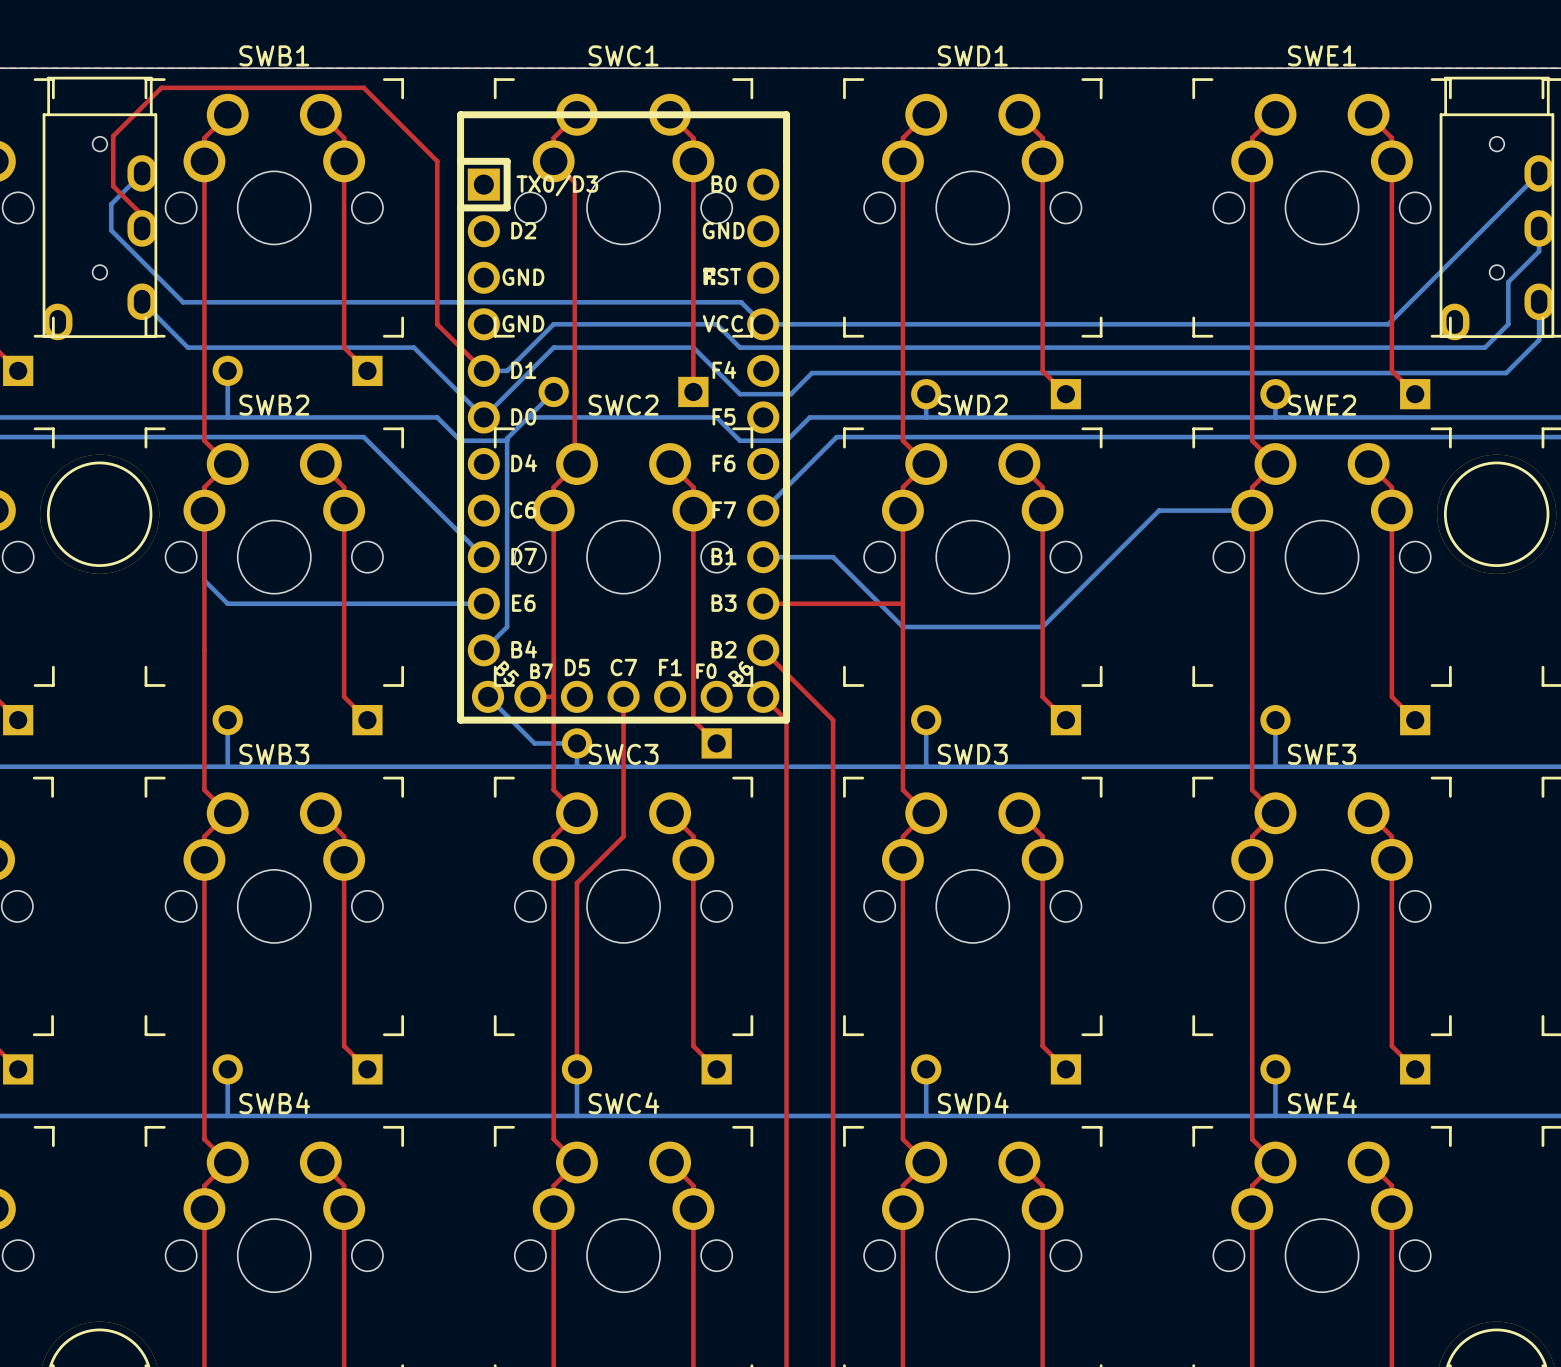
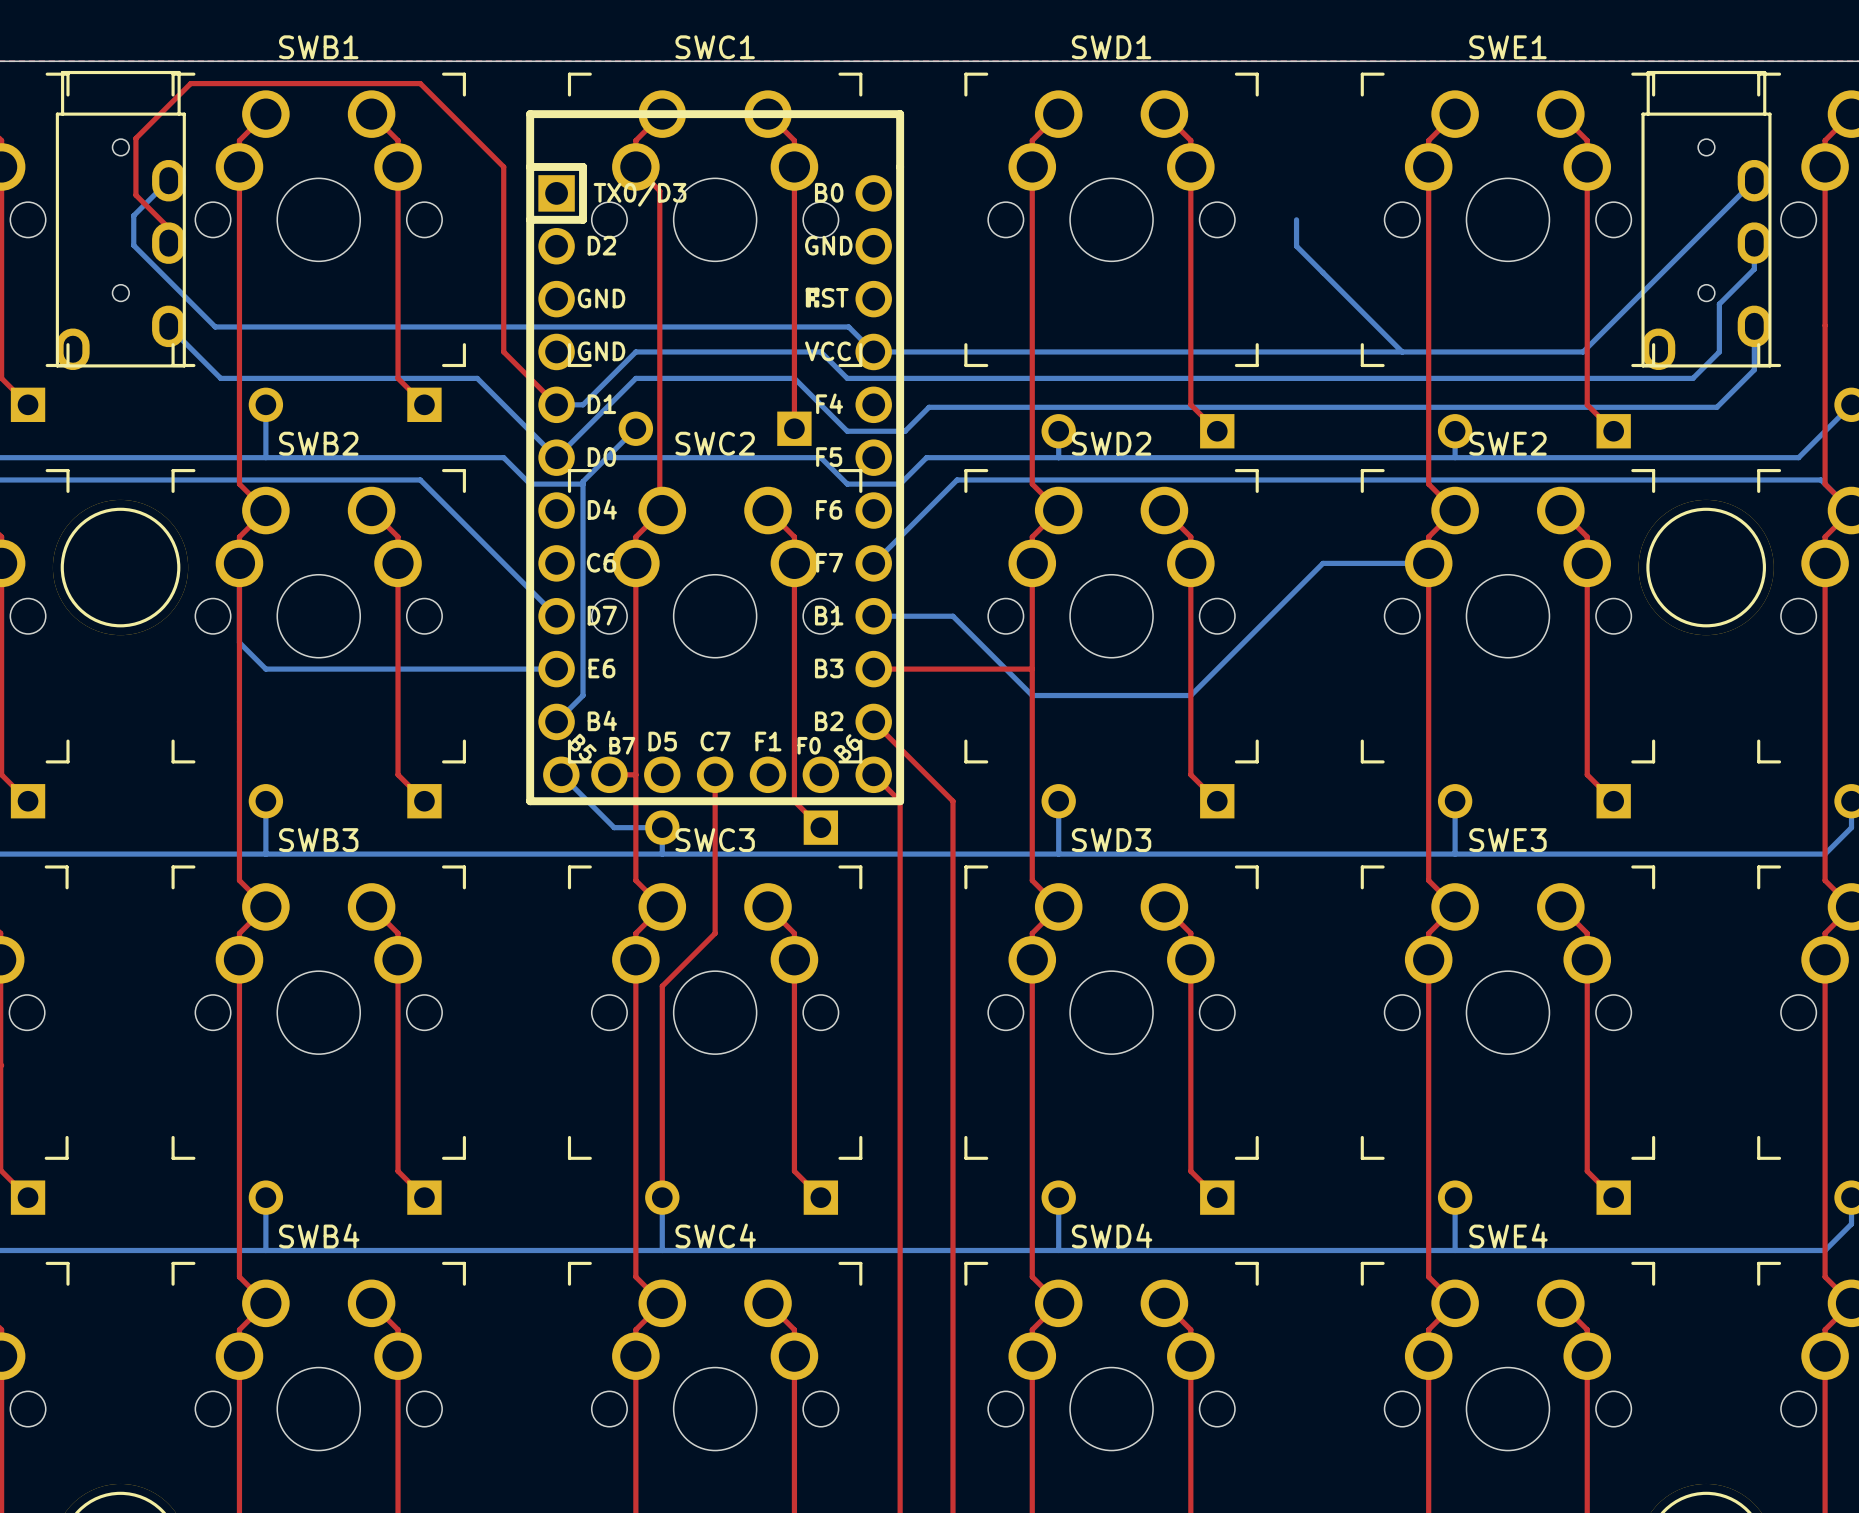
bottom track: none -> (1296, 219) (1296, 246) (1402, 351)

